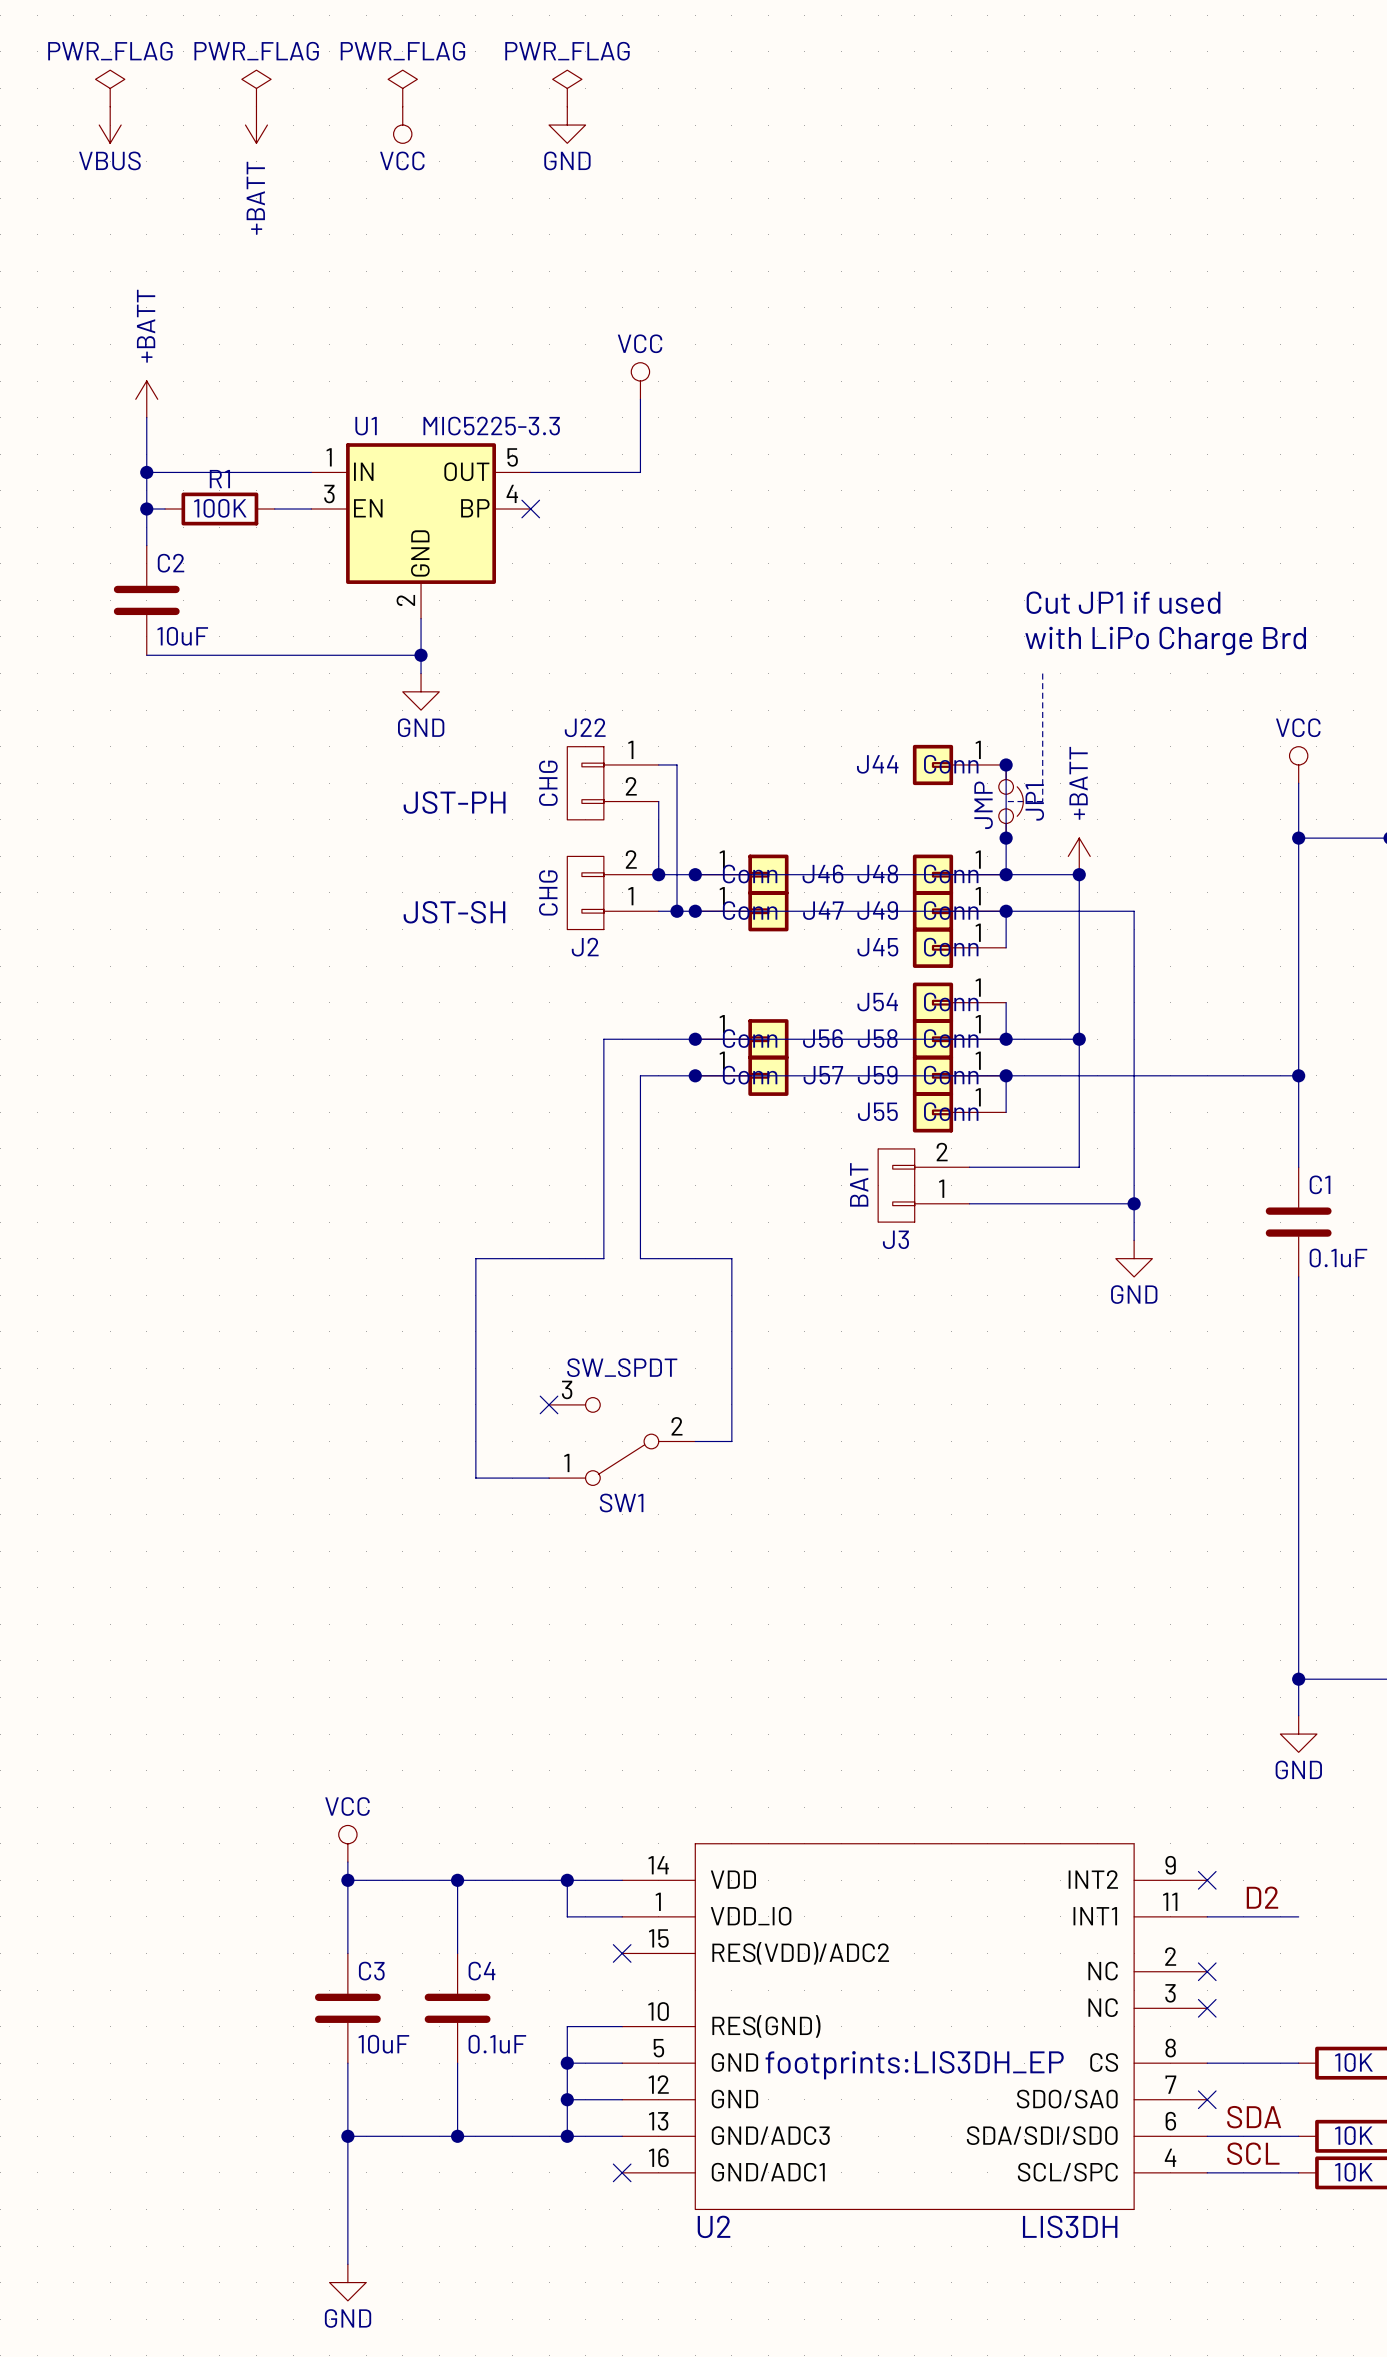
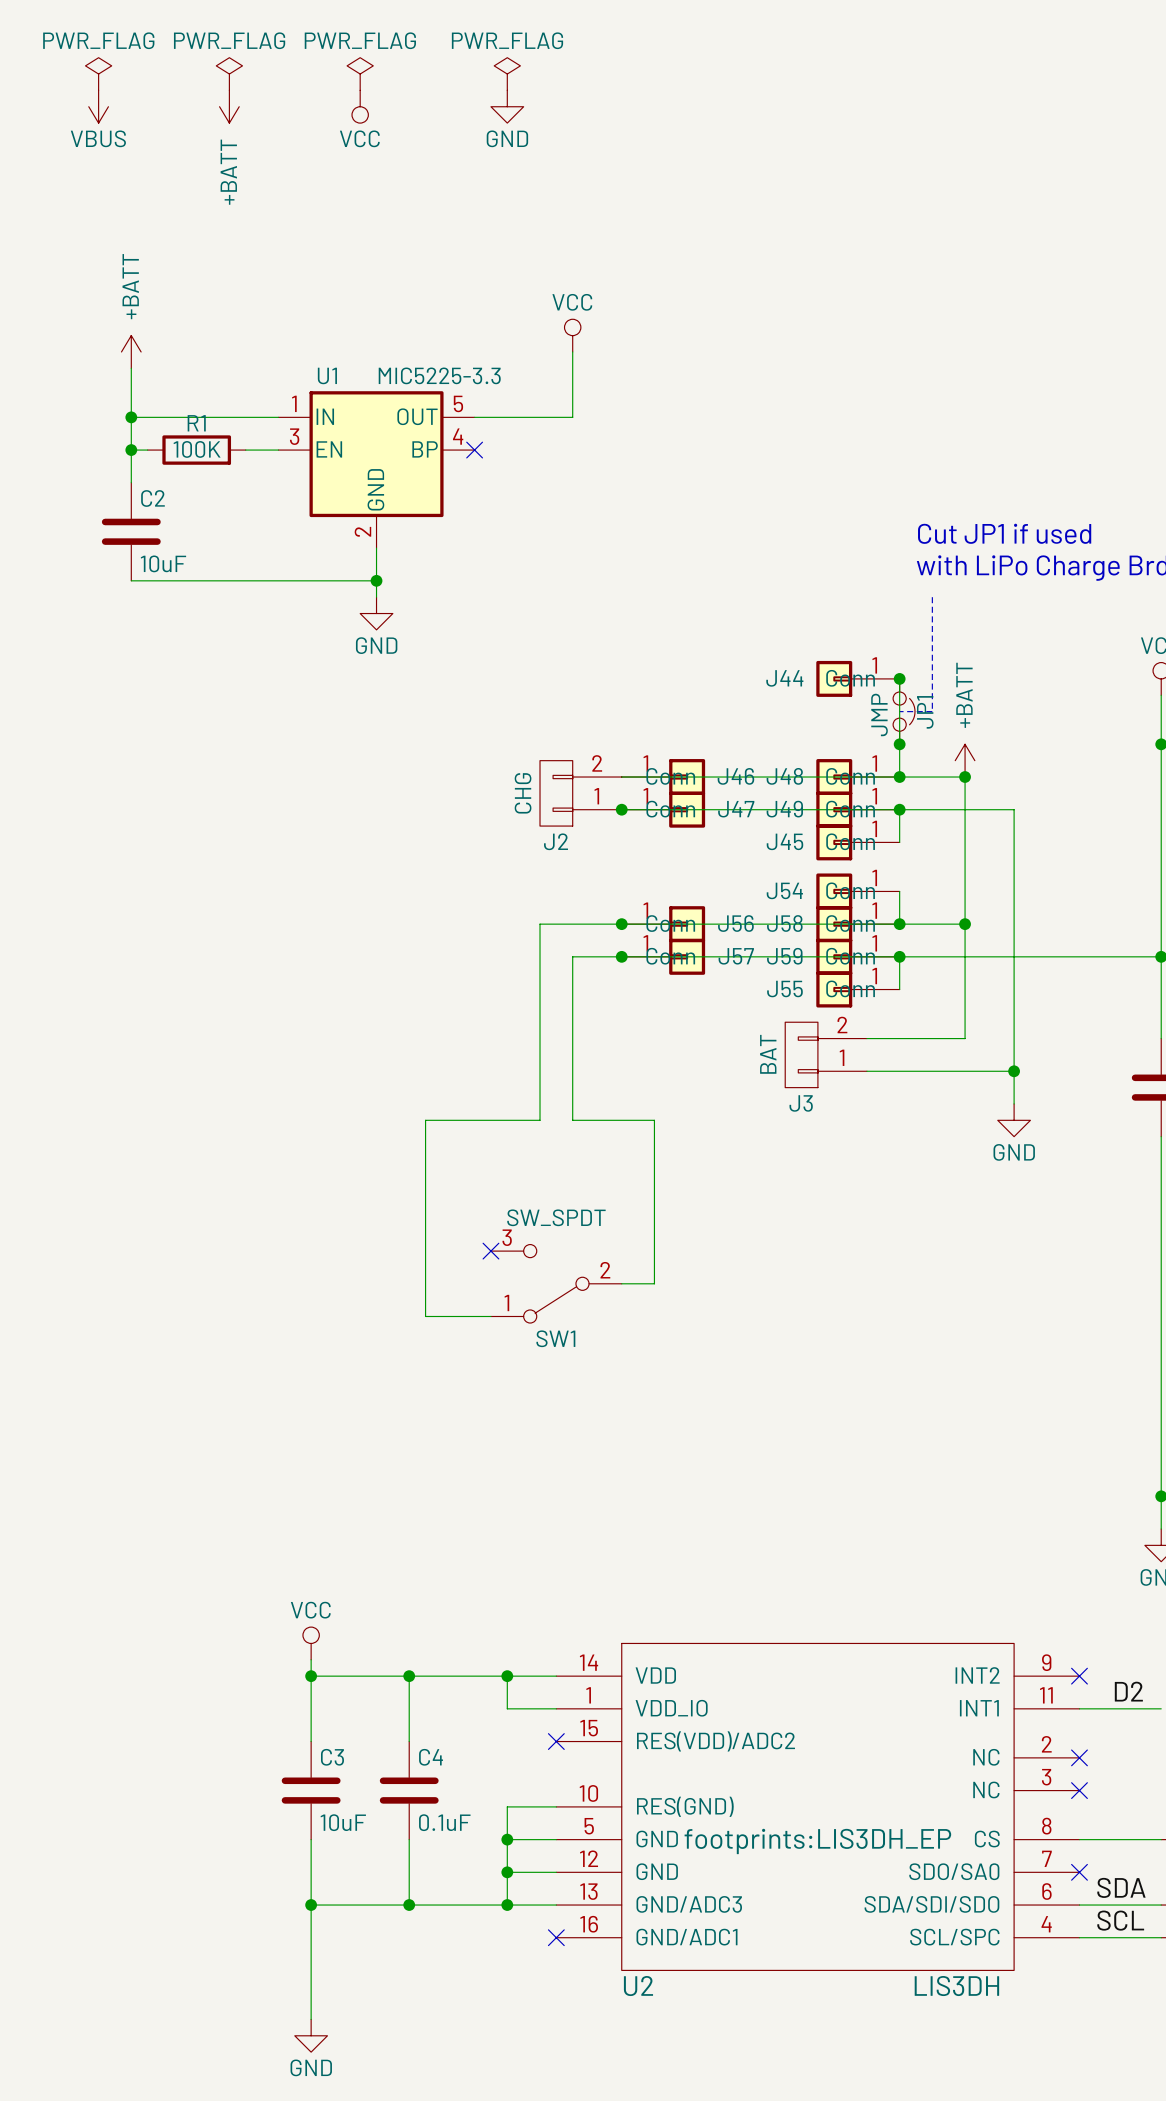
wire: (658, 764) (677, 764) (677, 911) -> none
J22: CHG (613, 783) -> none
wire: (658, 801) (658, 874) (695, 874) -> none
text: JST-PH (454, 802) -> none
junction: (658, 874) -> none
junction: (695, 874) -> none
J2 position: (613, 892) -> (580, 793)
junction: (677, 911) -> none
text: JST-SH (454, 912) -> none

